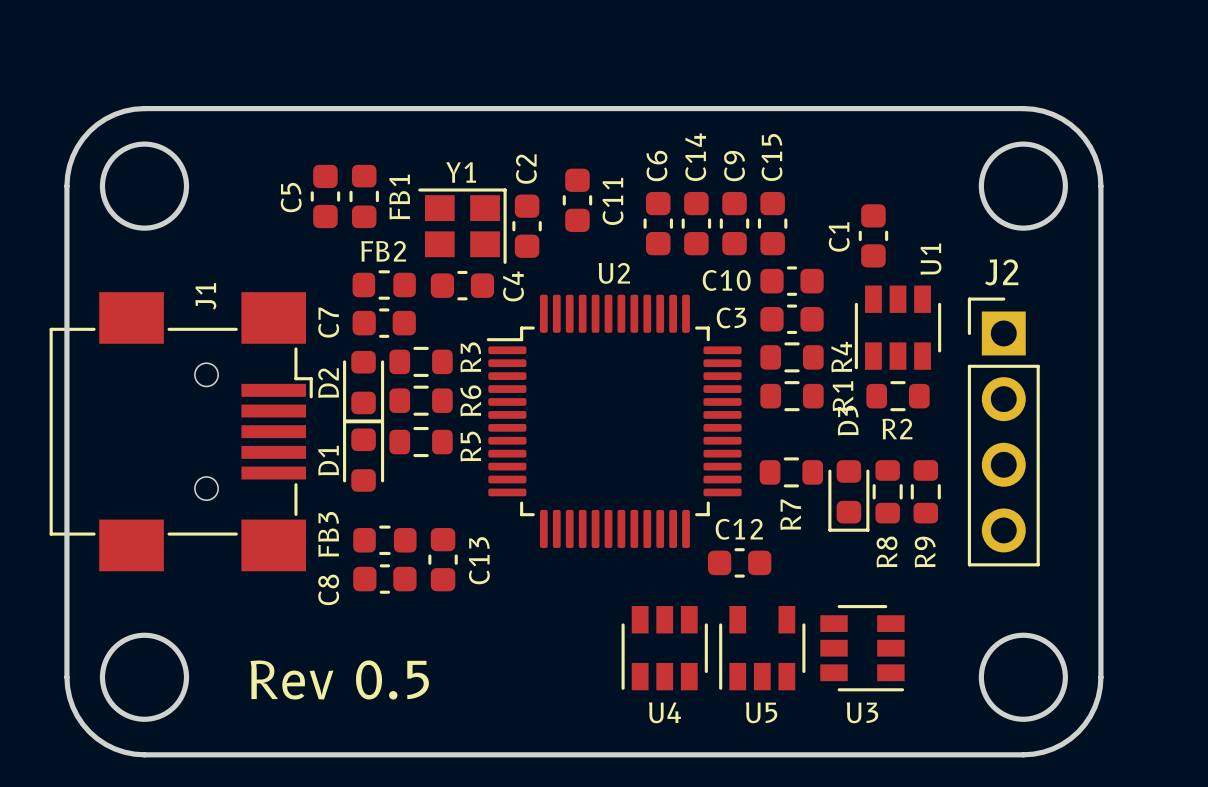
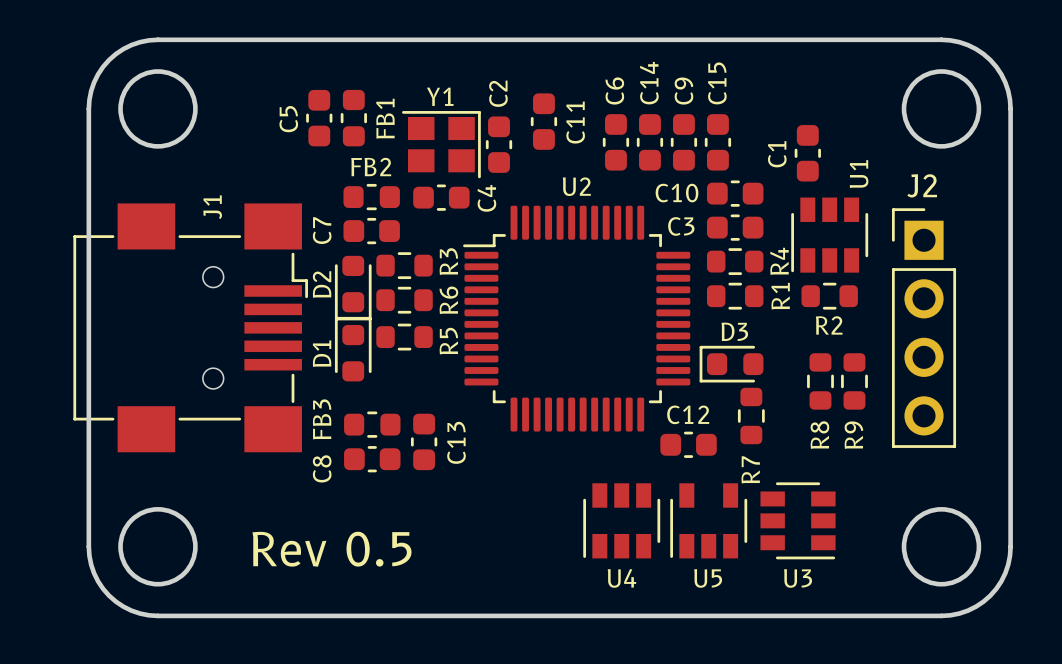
R7 rotation: 0° (791, 472) -> 90° clockwise (751, 416)
R7 position: (791, 472) -> (751, 416)
D3 rotation: 0° (848, 495) -> 90° clockwise (731, 364)
D3 position: (848, 495) -> (731, 364)

